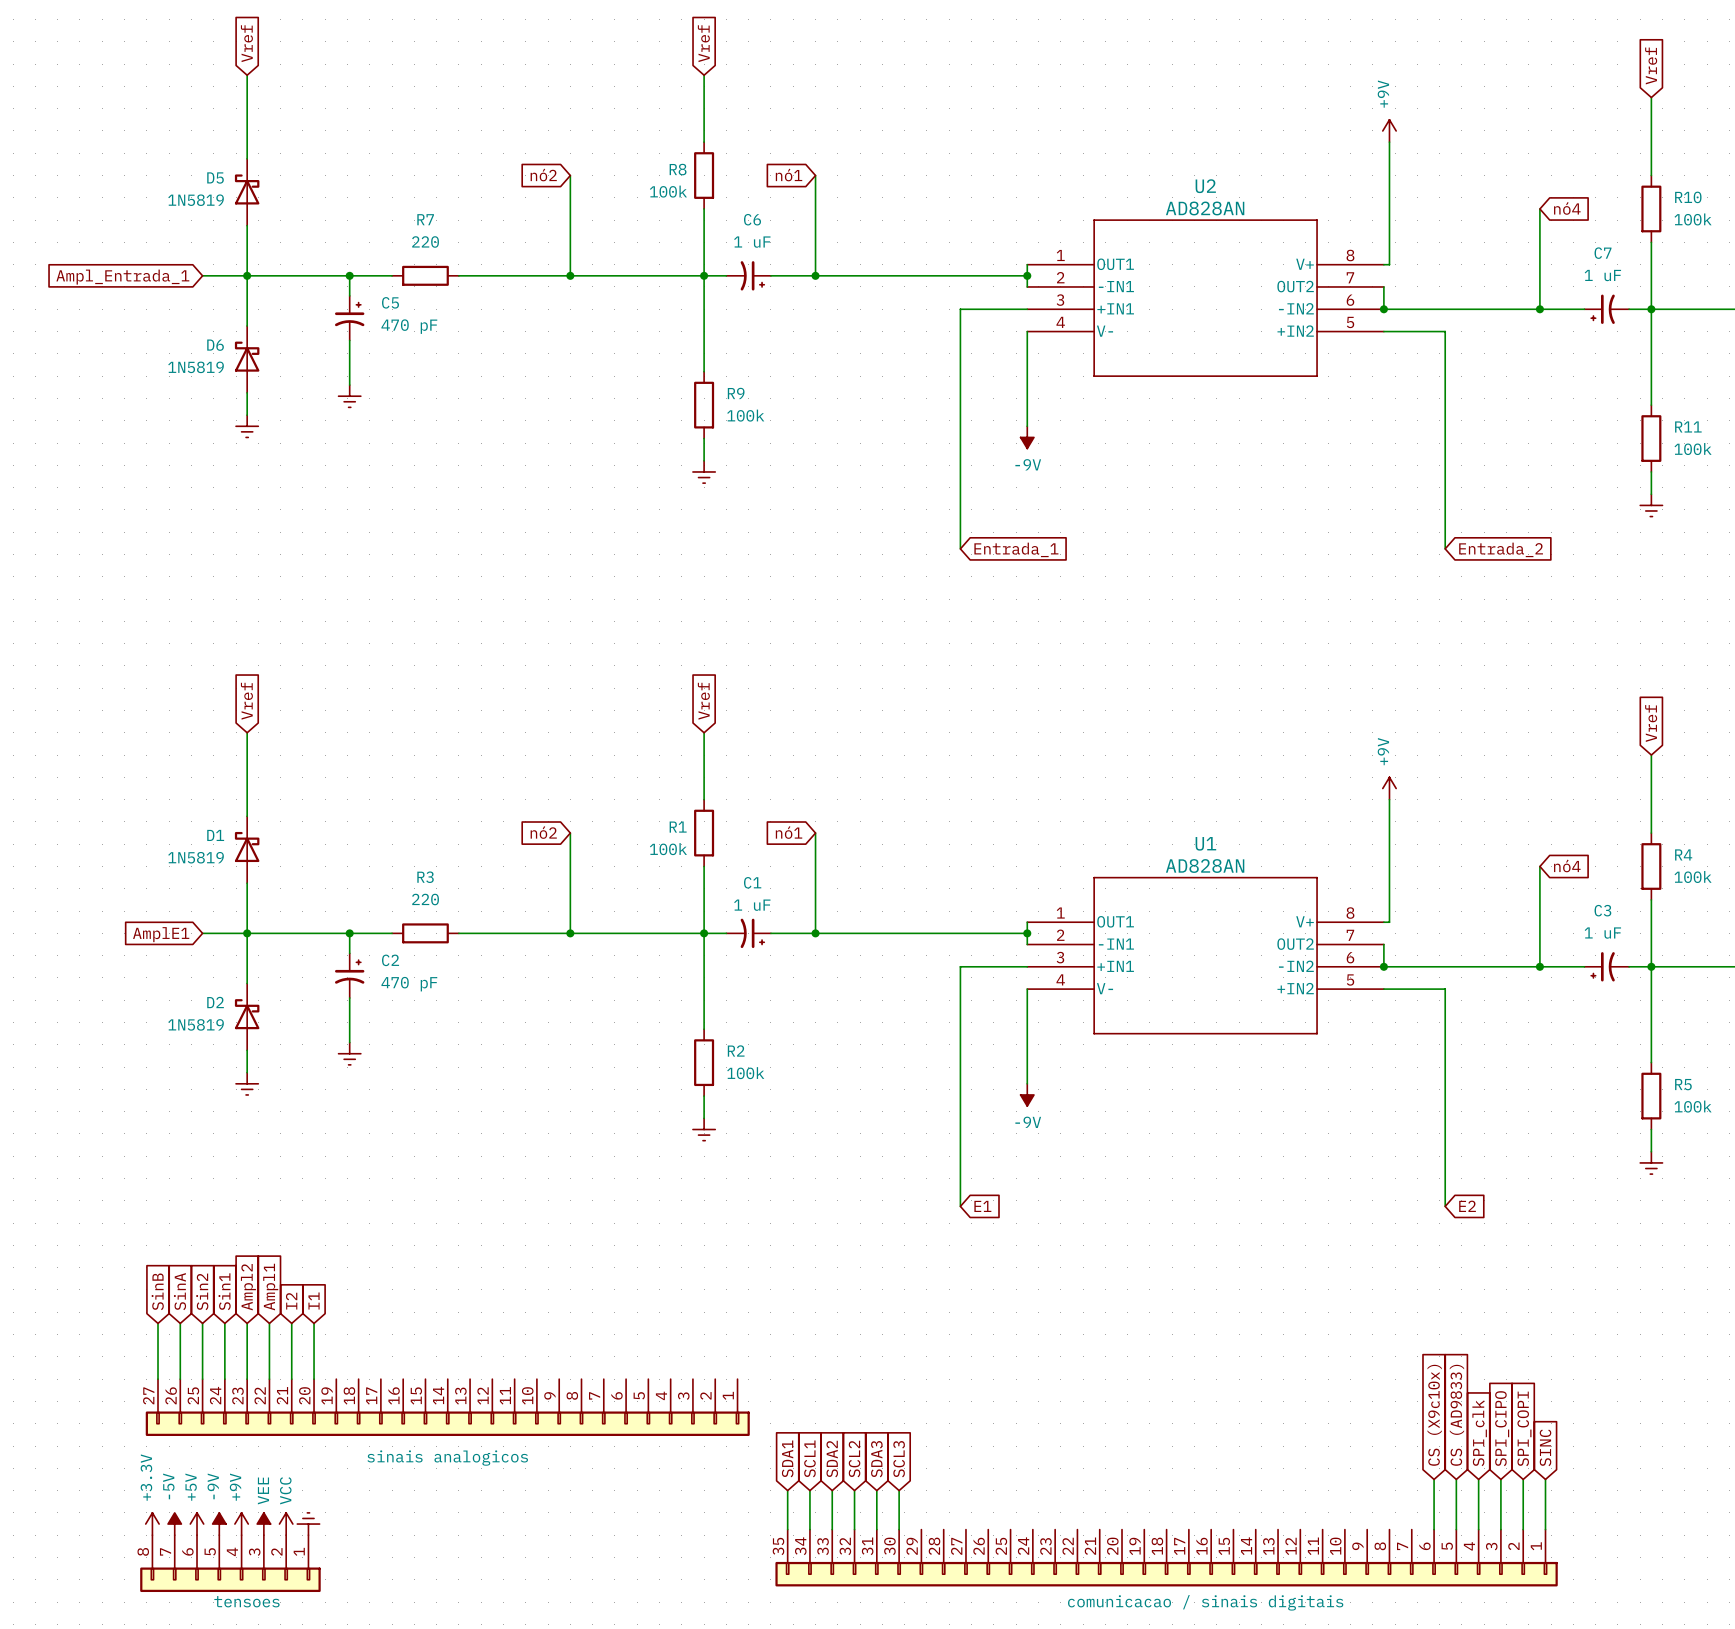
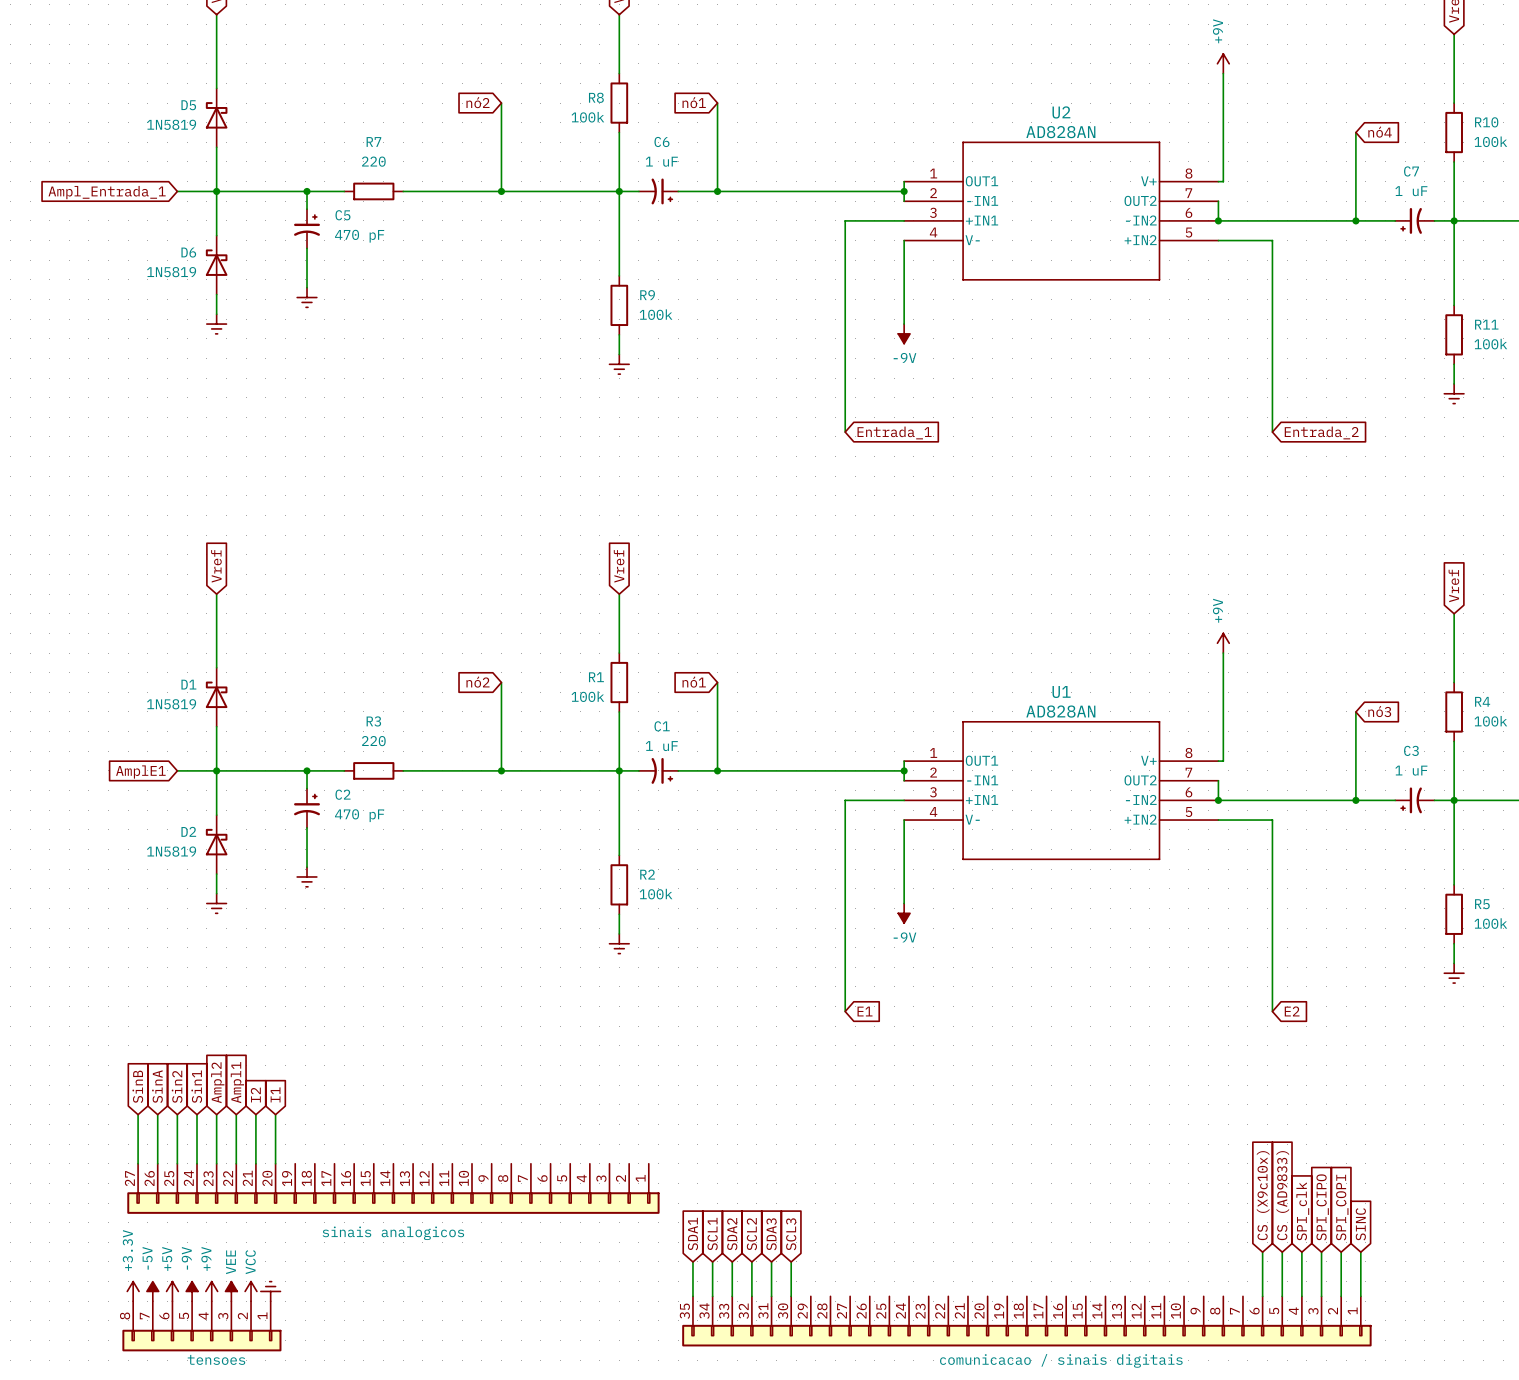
global label: nó4 (1567, 865) -> nó3 (1379, 711)

